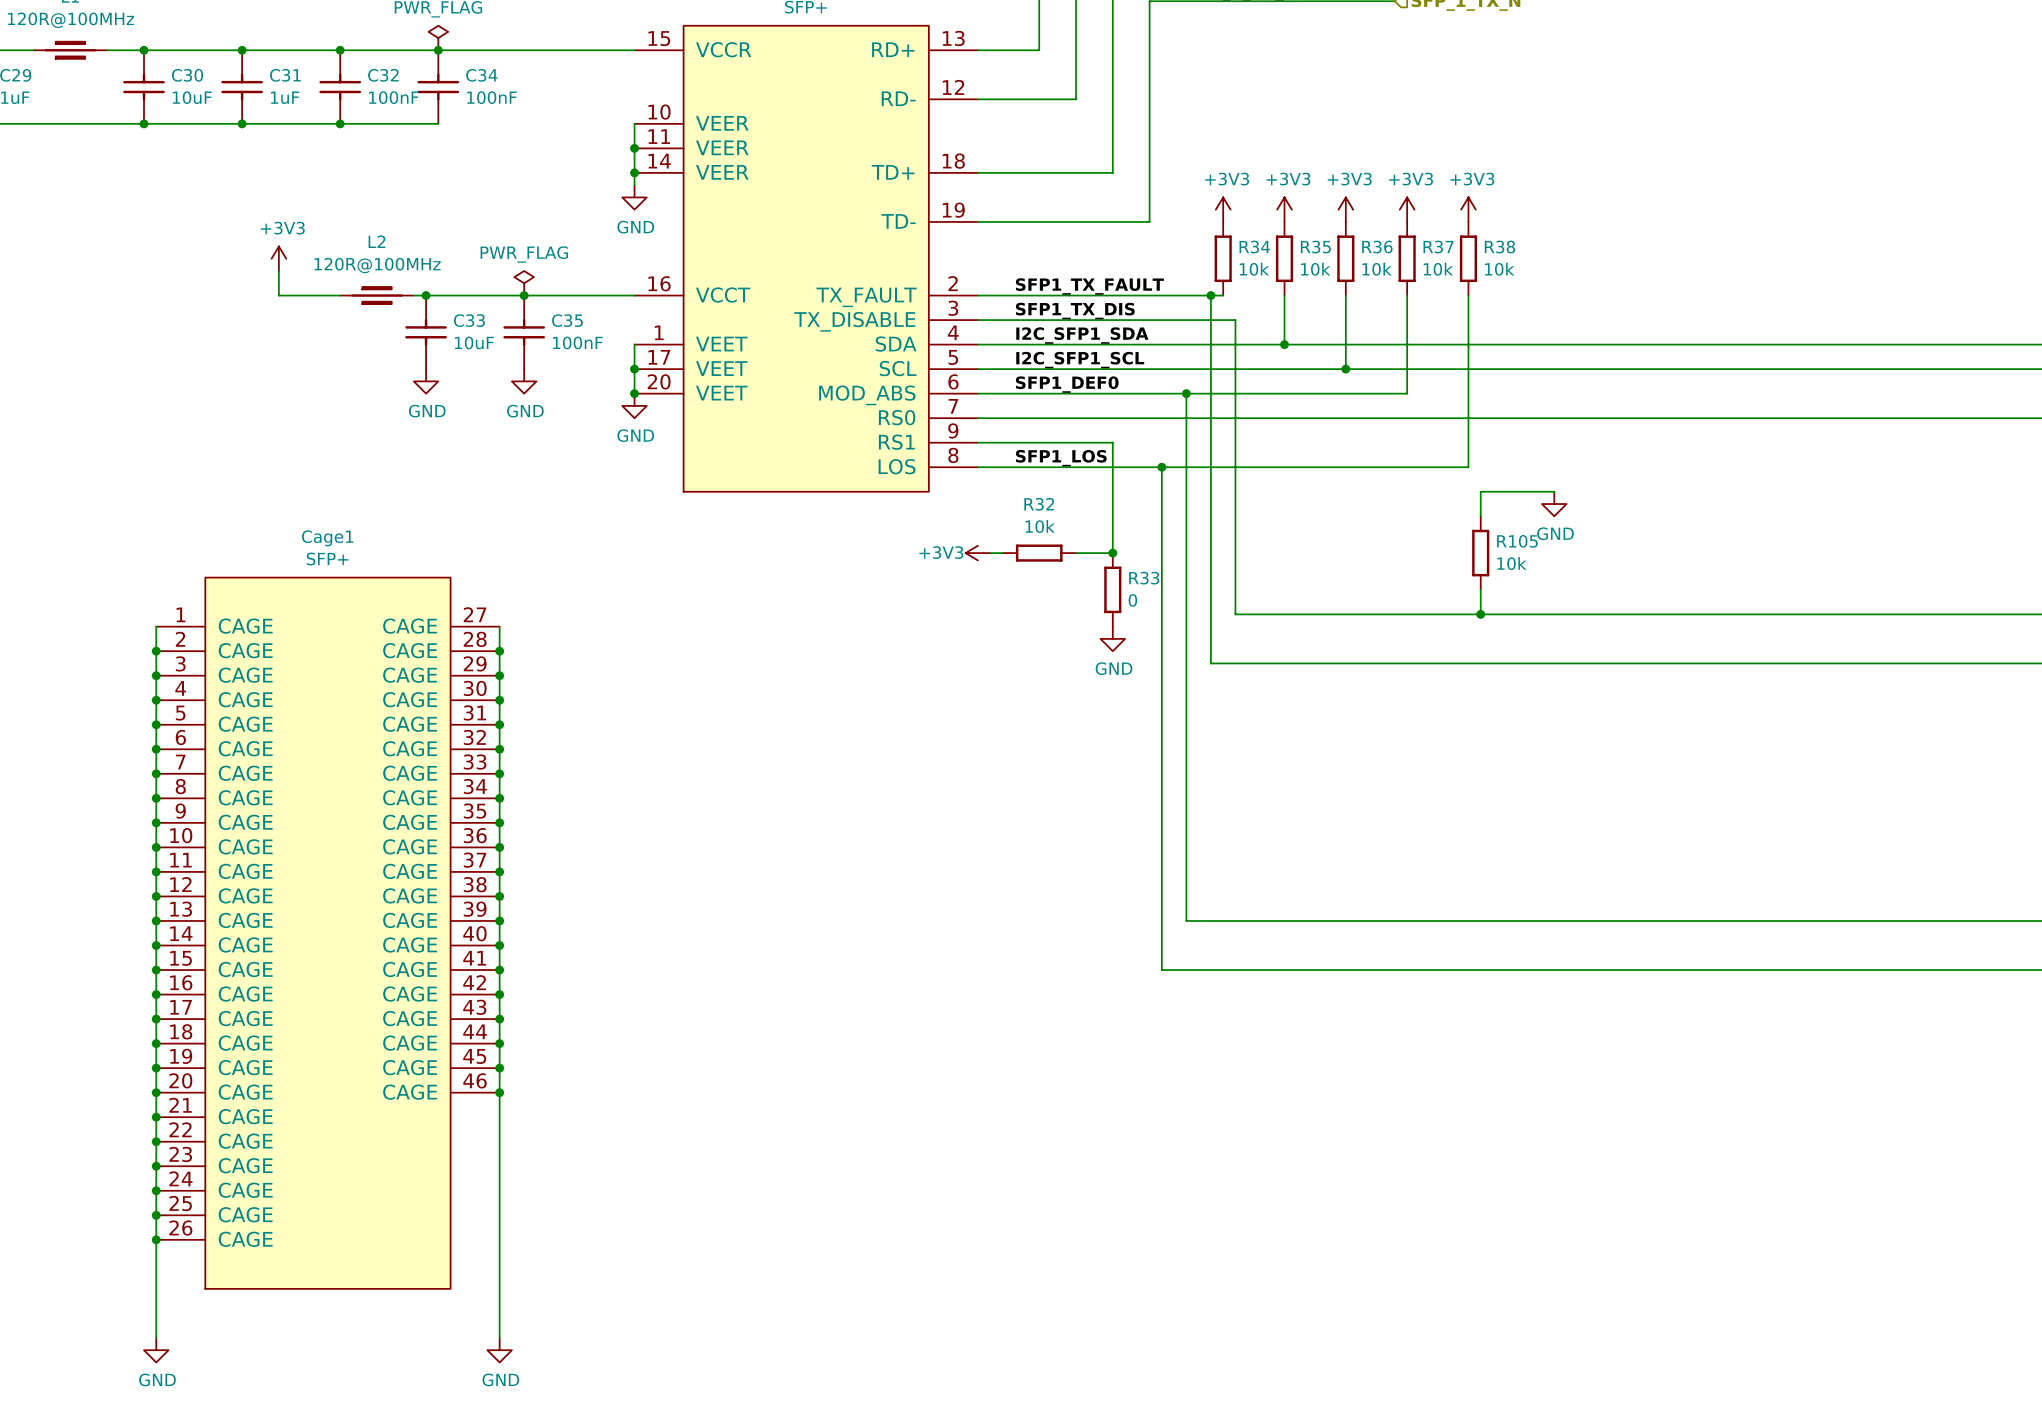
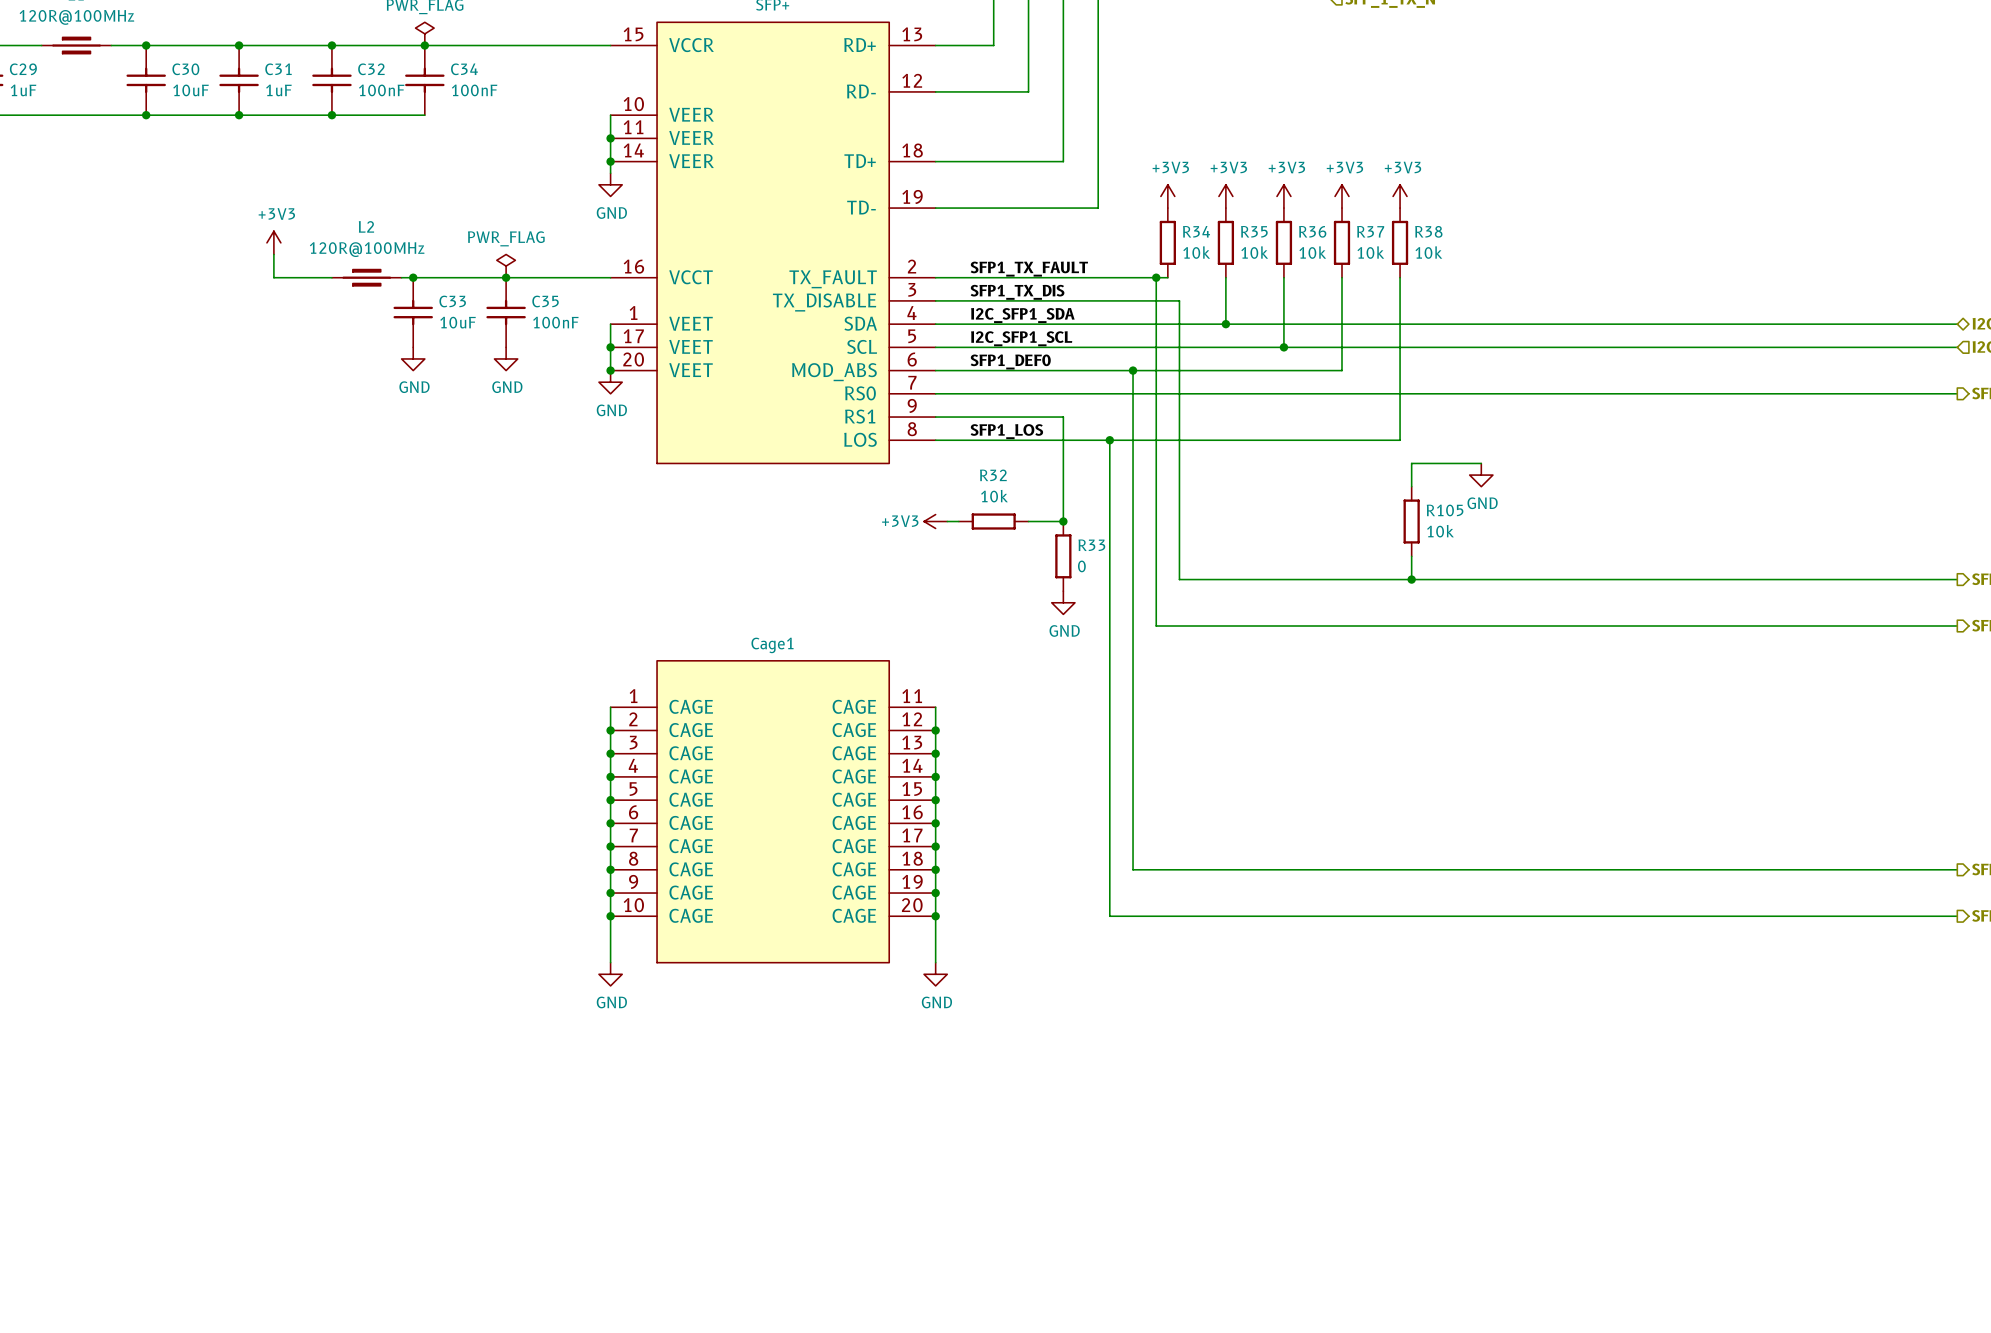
Cage1 name position: Cage1 (327, 538) -> Cage1 (772, 645)
Cage1 text: SFP+ (327, 559) -> none
Cage1 symbol: [156, 577, 500, 1289] -> [610, 660, 936, 963]
wire: (156, 626) (156, 1337) -> none
wire: (499, 626) (499, 1337) -> none
junction: (156, 651) -> none
junction: (499, 651) -> none
junction: (156, 675) -> none
junction: (499, 675) -> none
junction: (156, 700) -> none
junction: (499, 700) -> none
junction: (156, 724) -> none
junction: (499, 724) -> none
junction: (156, 749) -> none
junction: (499, 749) -> none
wire: none -> (610, 707) (610, 962)
wire: none -> (935, 707) (935, 962)
junction: (156, 773) -> none
junction: (499, 773) -> none
junction: none -> (610, 730)
junction: none -> (935, 730)
junction: (156, 798) -> none
junction: (499, 798) -> none
junction: none -> (610, 753)
junction: none -> (935, 753)
junction: (156, 822) -> none
junction: (499, 822) -> none
junction: none -> (610, 776)
junction: none -> (935, 776)
junction: (156, 847) -> none
junction: (499, 847) -> none
junction: none -> (610, 800)
junction: none -> (935, 800)
junction: (156, 871) -> none
junction: (499, 871) -> none
junction: none -> (610, 823)
junction: none -> (935, 823)
junction: (156, 896) -> none
junction: (499, 896) -> none
junction: none -> (610, 846)
junction: none -> (935, 846)
junction: (156, 920) -> none
junction: (499, 920) -> none
junction: none -> (610, 869)
junction: none -> (935, 869)
junction: (156, 945) -> none
junction: (499, 945) -> none
junction: none -> (610, 893)
junction: none -> (935, 893)
junction: (156, 970) -> none
junction: (499, 970) -> none
junction: none -> (610, 916)
junction: none -> (935, 916)
junction: (156, 994) -> none
junction: (499, 994) -> none
junction: (156, 1019) -> none
junction: (499, 1019) -> none
power symbol: none -> GND (610, 974)
power symbol: none -> GND (935, 974)
junction: (156, 1043) -> none
junction: (499, 1043) -> none
junction: (156, 1068) -> none
junction: (499, 1068) -> none
junction: (156, 1092) -> none
junction: (499, 1092) -> none
junction: (156, 1117) -> none
junction: (156, 1141) -> none
junction: (156, 1166) -> none
junction: (156, 1190) -> none
junction: (156, 1215) -> none
junction: (156, 1239) -> none
power symbol: GND (156, 1350) -> none
power symbol: GND (499, 1350) -> none

